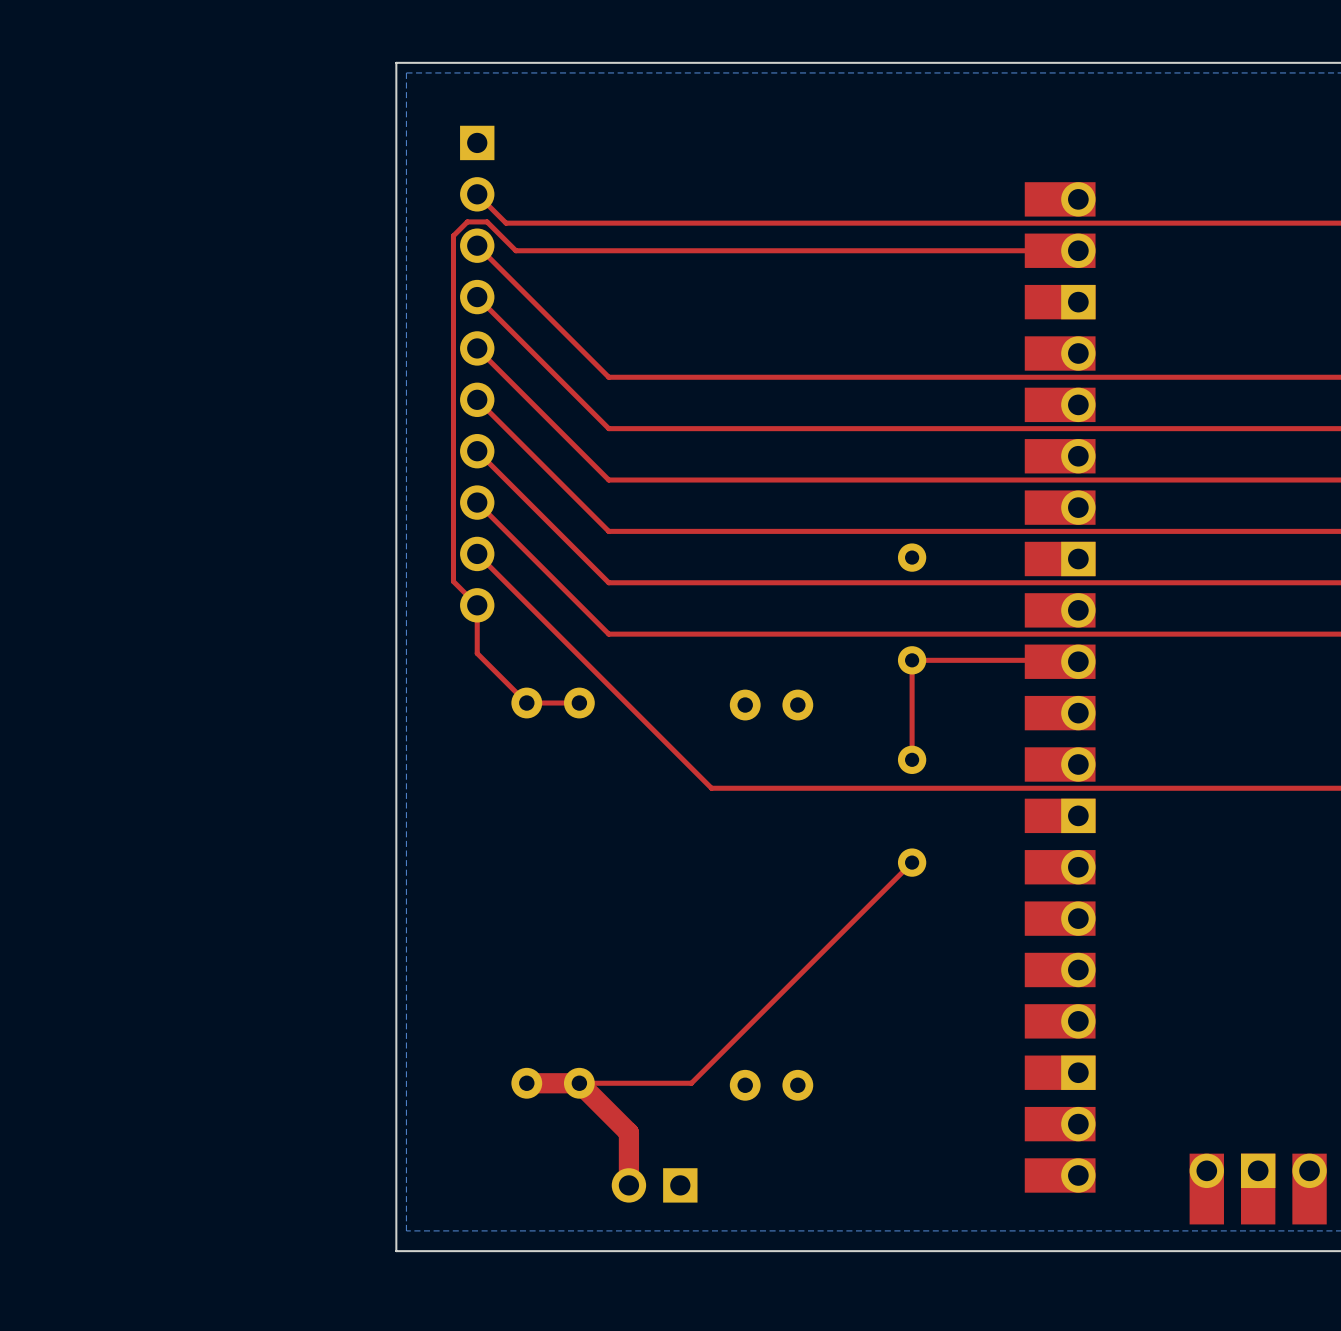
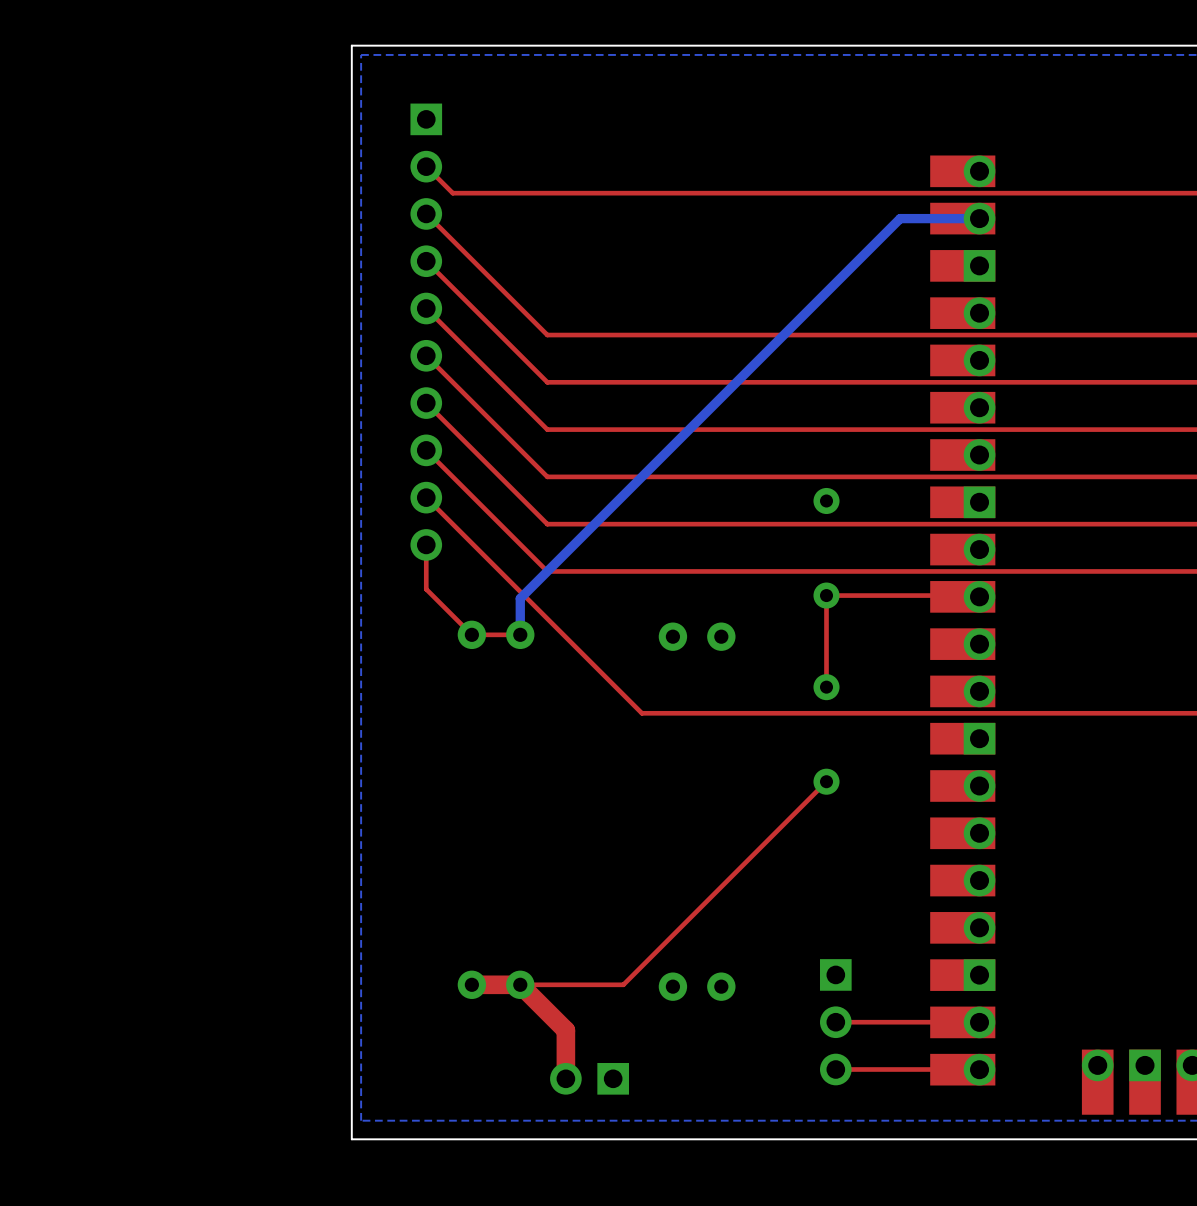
top track: (1078, 250) (515, 250) (487, 221) (467, 221) (453, 235) (453, 581) (477, 605) -> none
bottom track: none -> (979, 218) (900, 218) (520, 598) (520, 634)
part: none -> (835, 1022)
top track: none -> (979, 1022) (835, 1022)
top track: none -> (979, 1069) (835, 1069)

